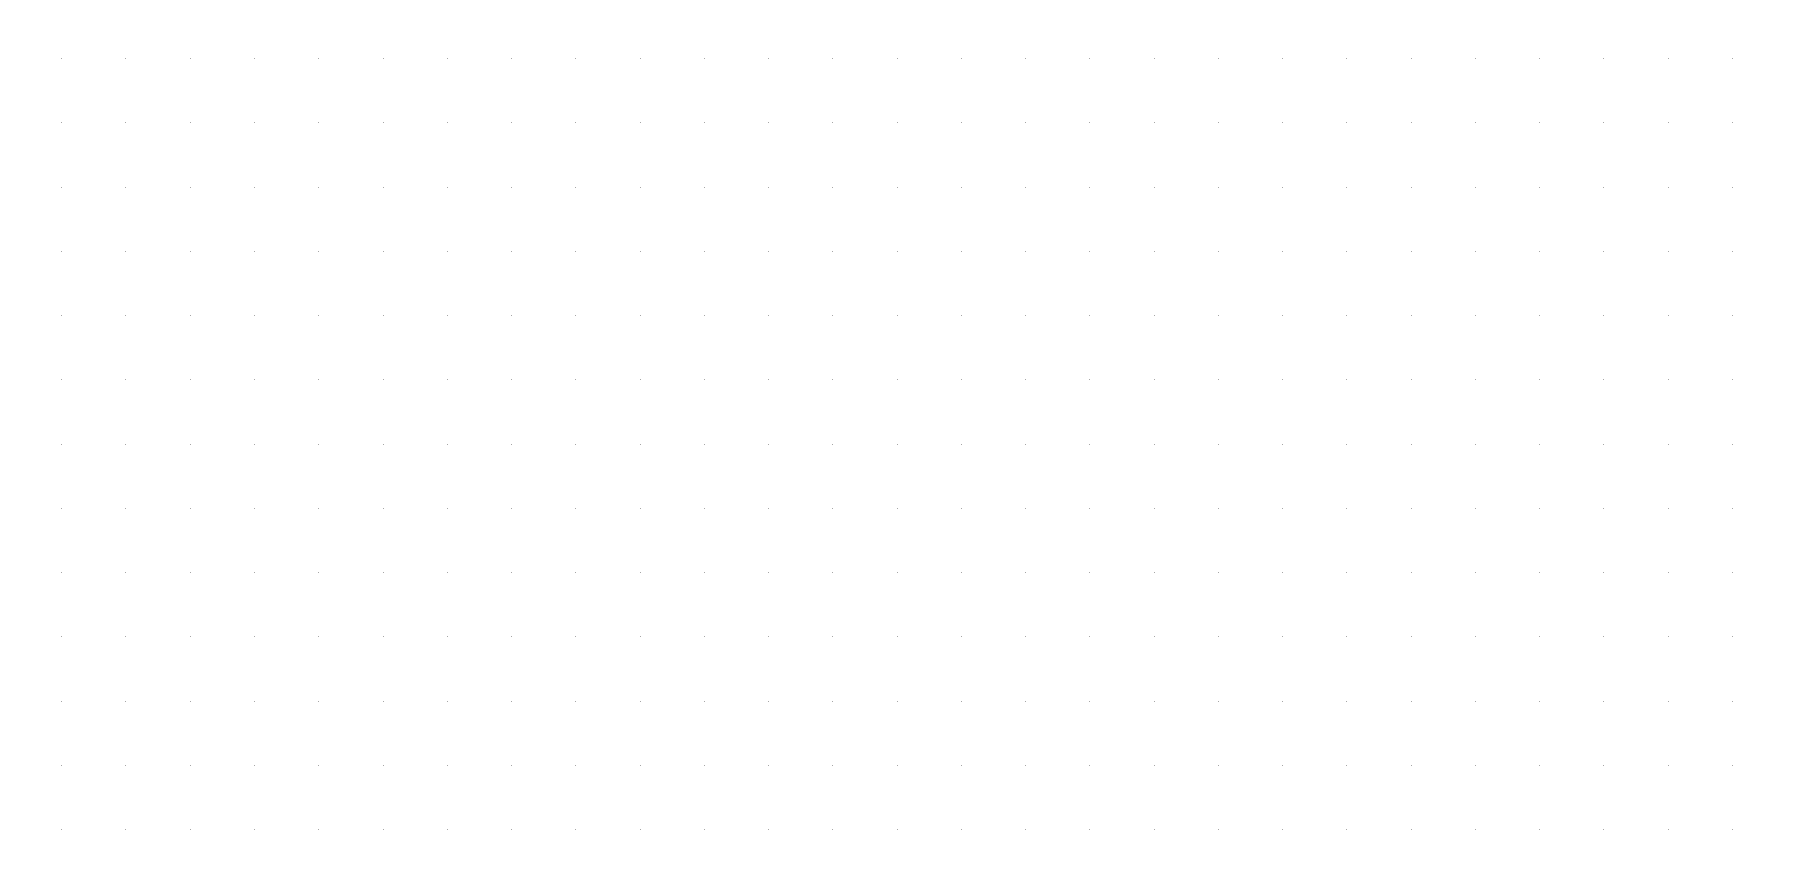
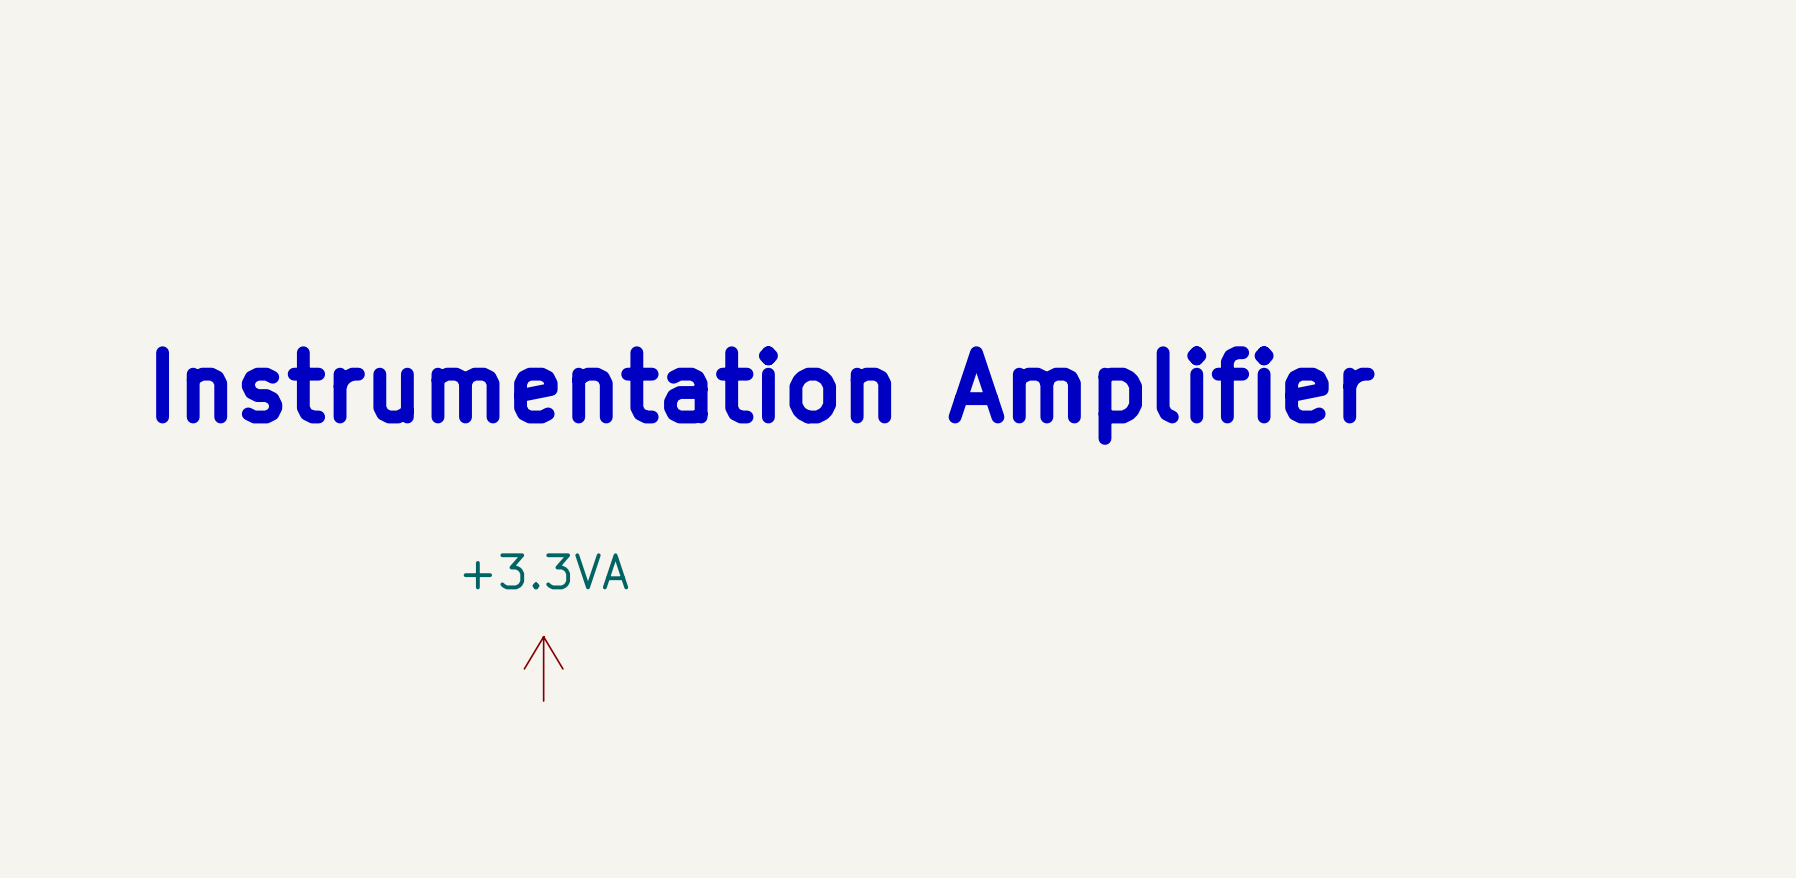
text: none -> Instrumentation Amplifier (765, 395)
power symbol: none -> +3.3VA (543, 668)

